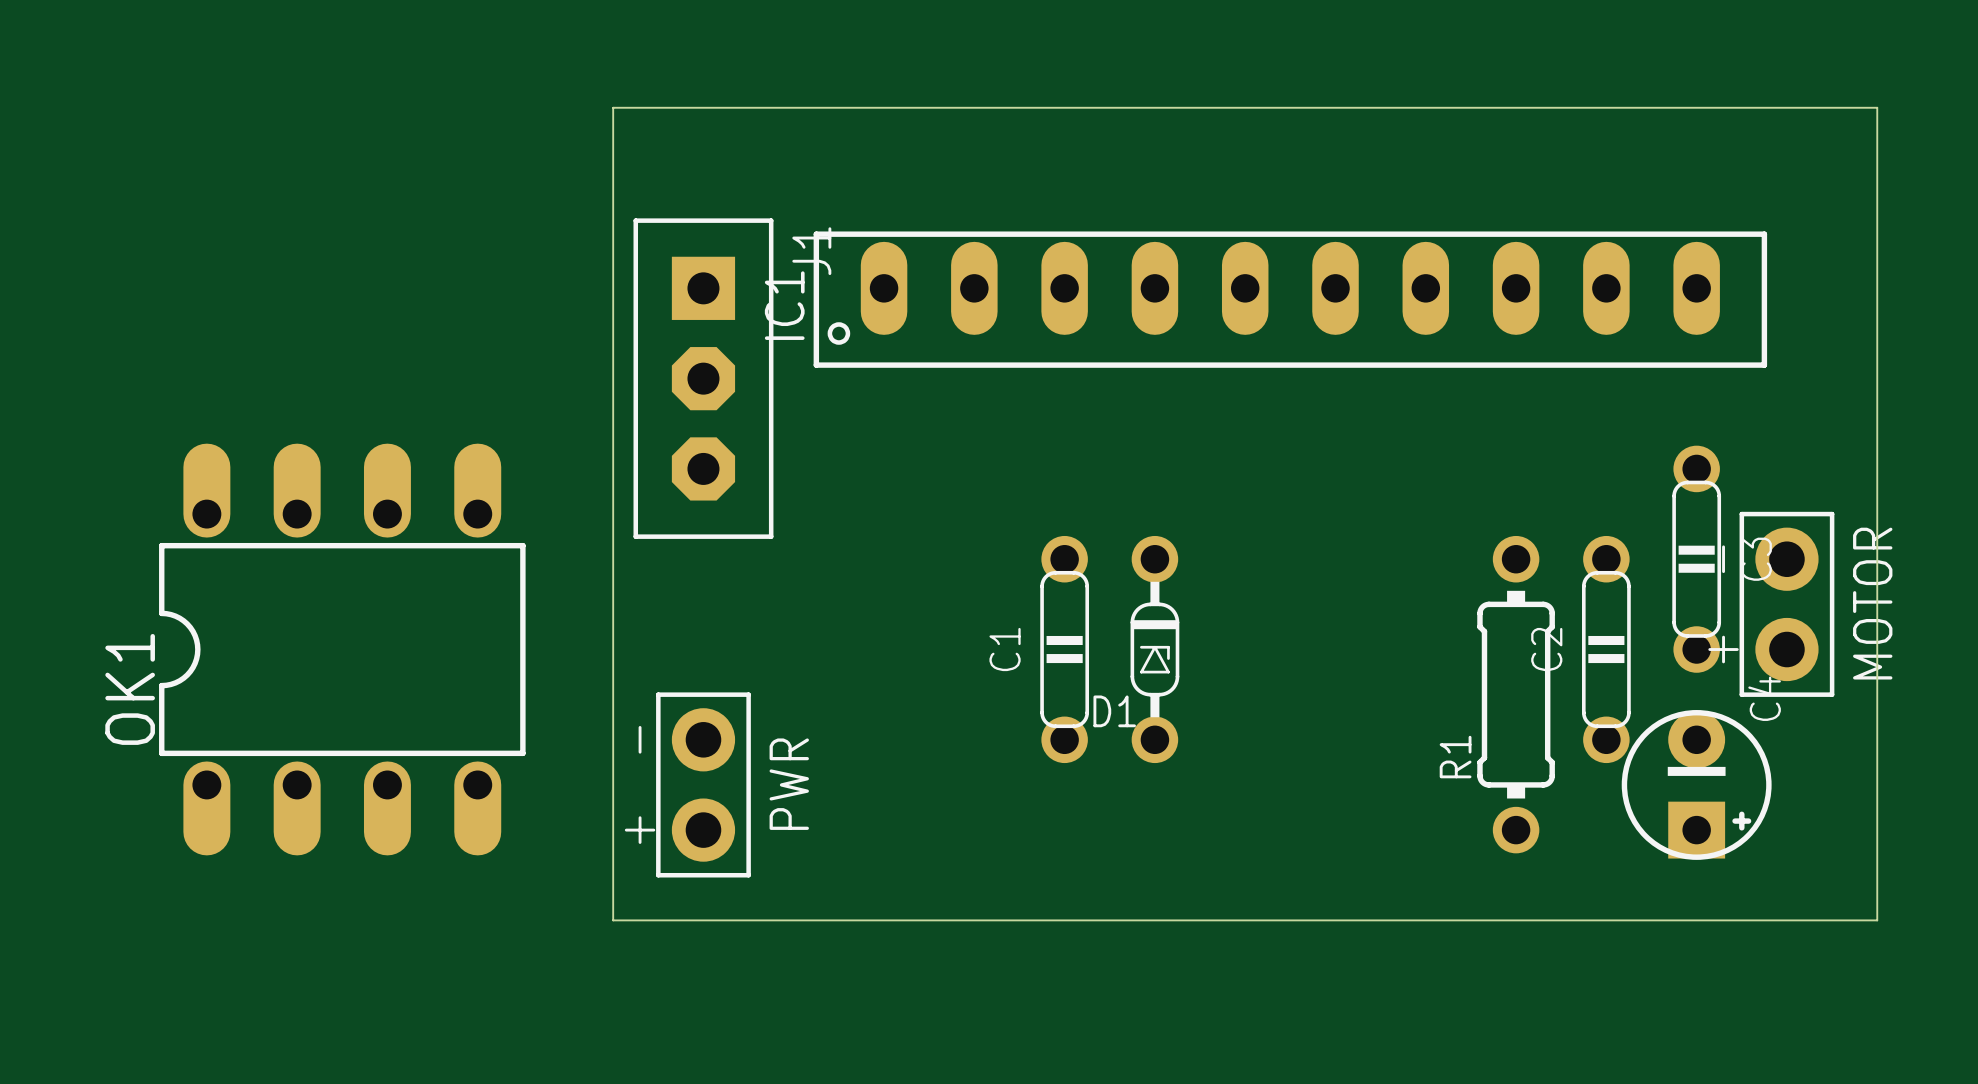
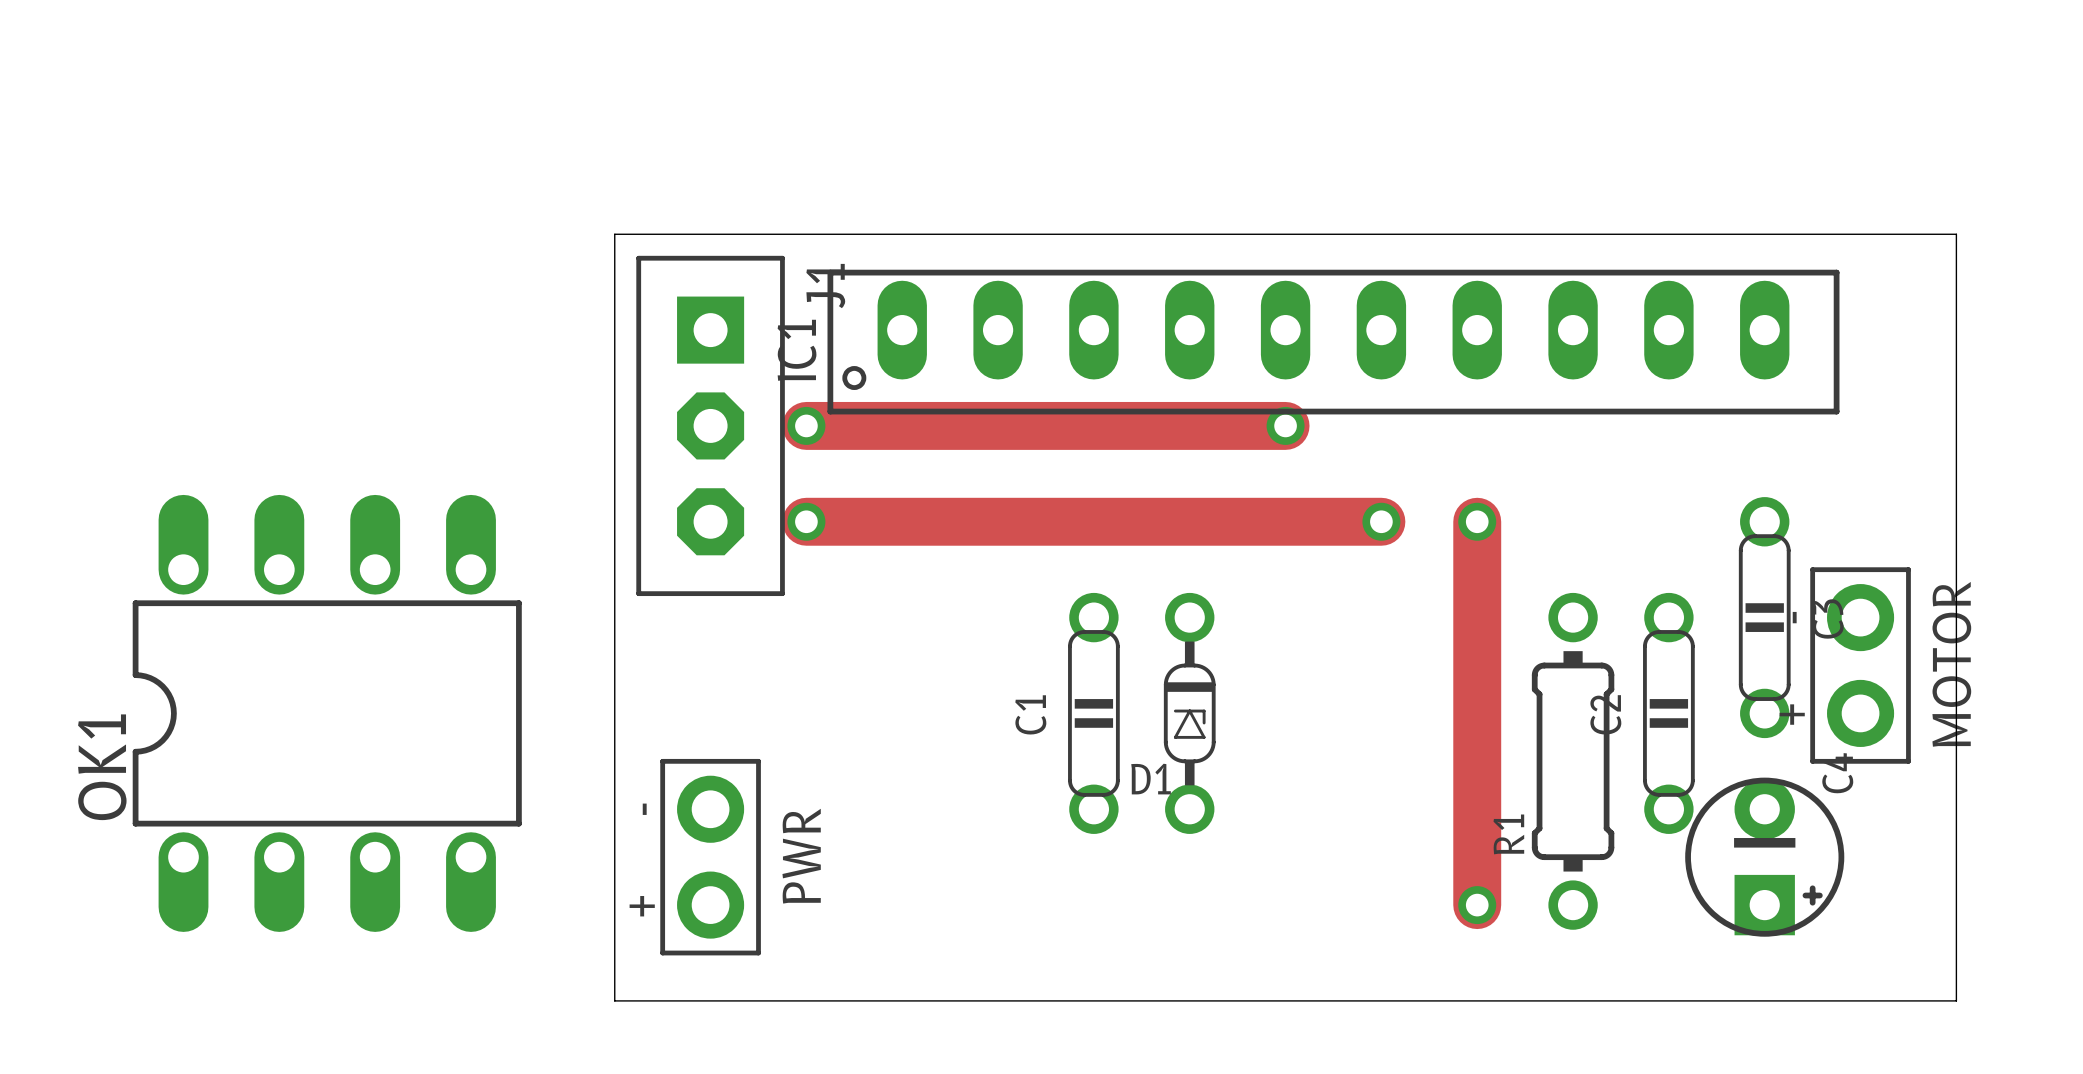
board edge: (613, 198) (613, 107) (1877, 107) (1877, 198) -> (614, 234) (1956, 234)
track: none -> (806, 425) (1285, 425)
via: none -> (806, 425)
via: none -> (1285, 425)
track: none -> (806, 521) (1381, 521)
via: none -> (806, 521)
via: none -> (1381, 521)
track: none -> (1477, 521) (1477, 905)
via: none -> (1477, 521)
via: none -> (1477, 905)

